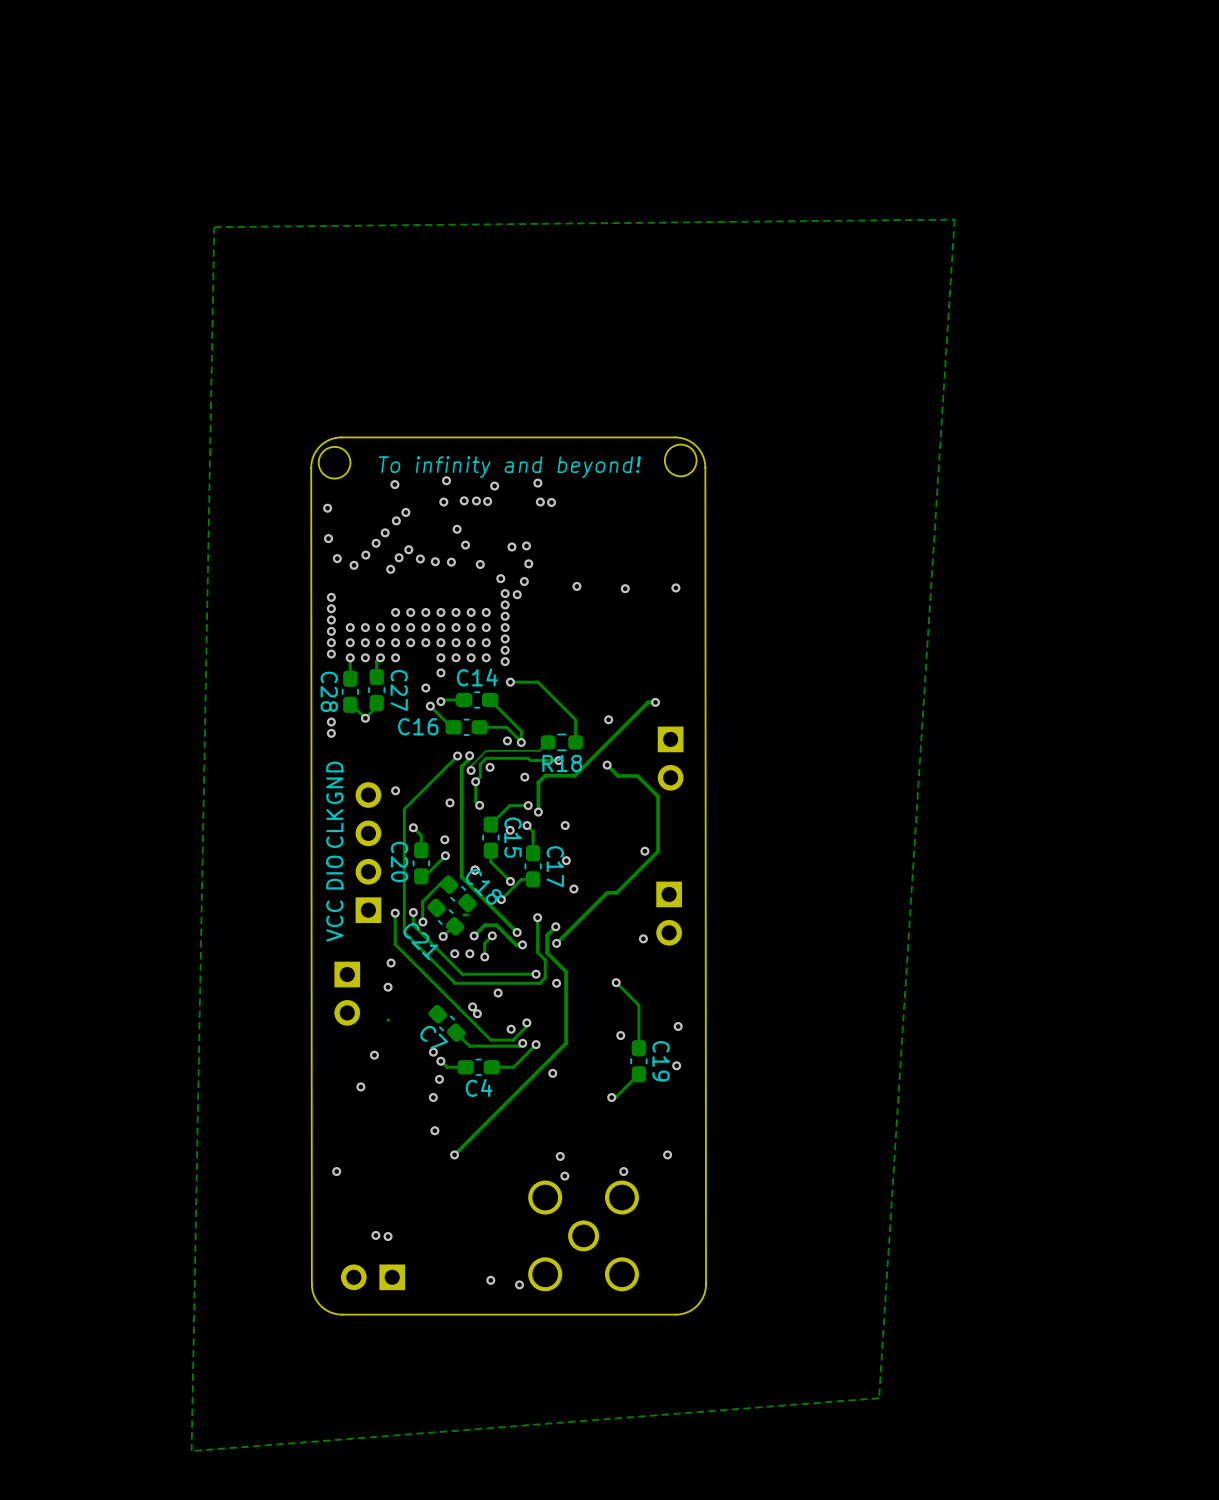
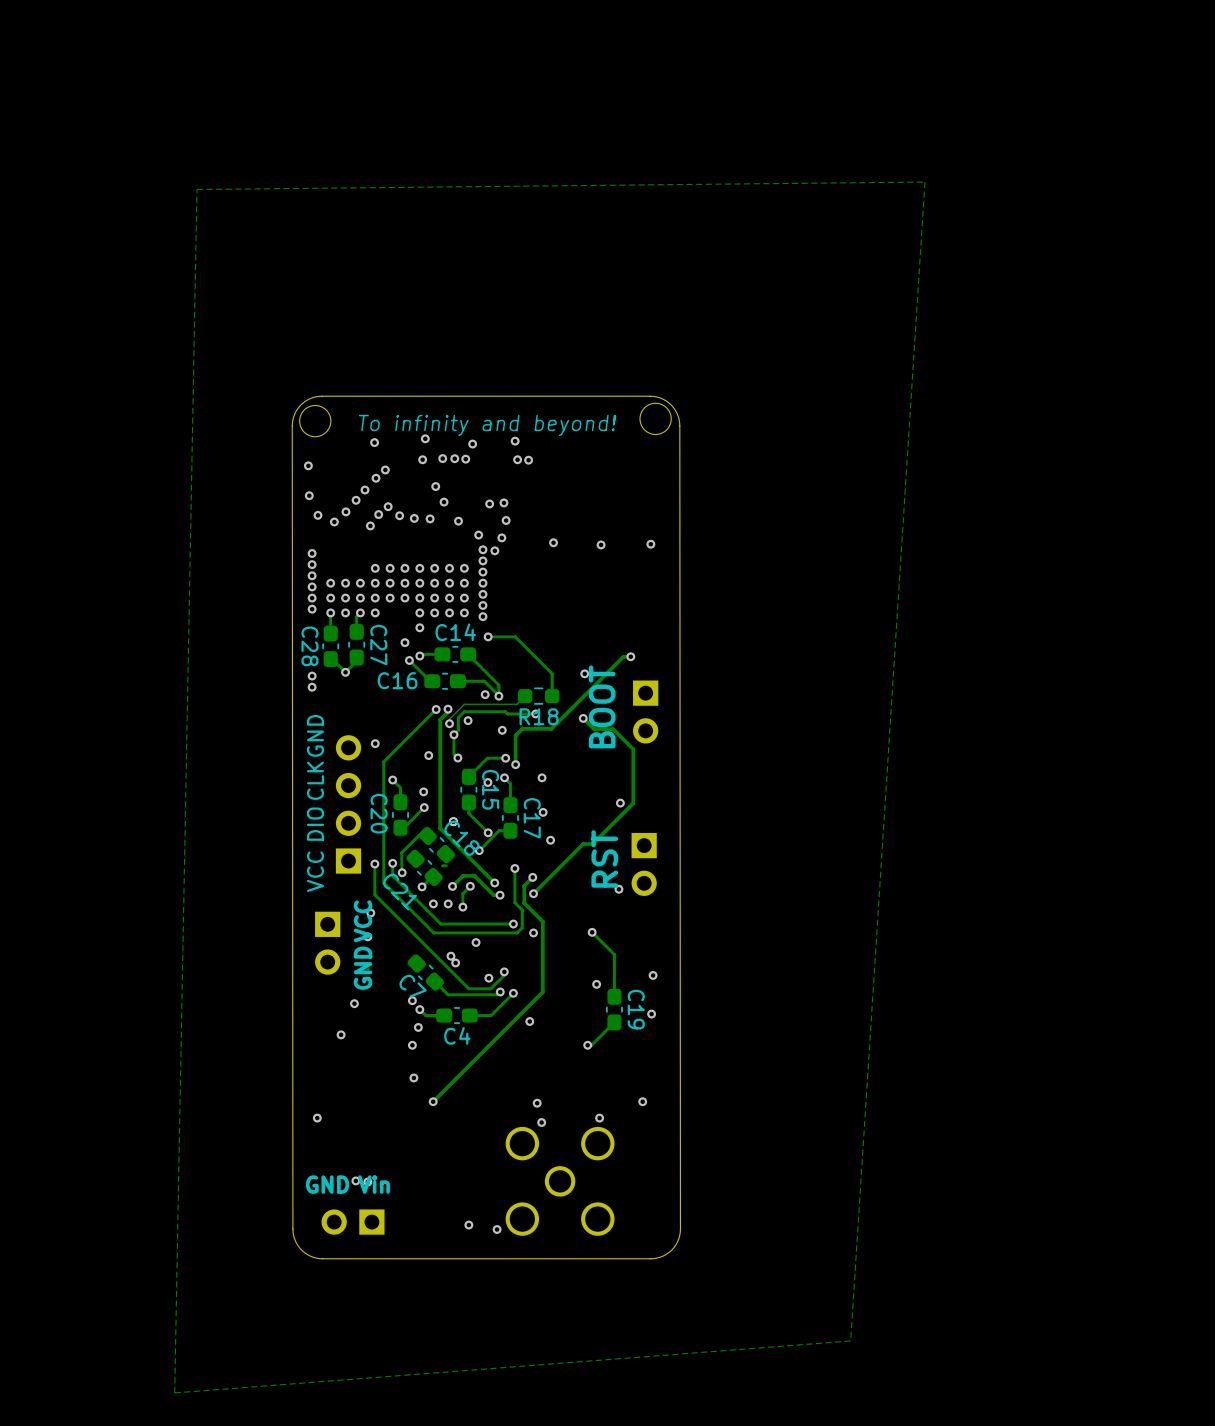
text: none -> BOOT (602, 706)
text: none -> RST (604, 858)
text: none -> VCC (363, 921)
text: none -> GND (363, 968)
text: none -> GND (327, 1184)
text: none -> Vin (373, 1184)

